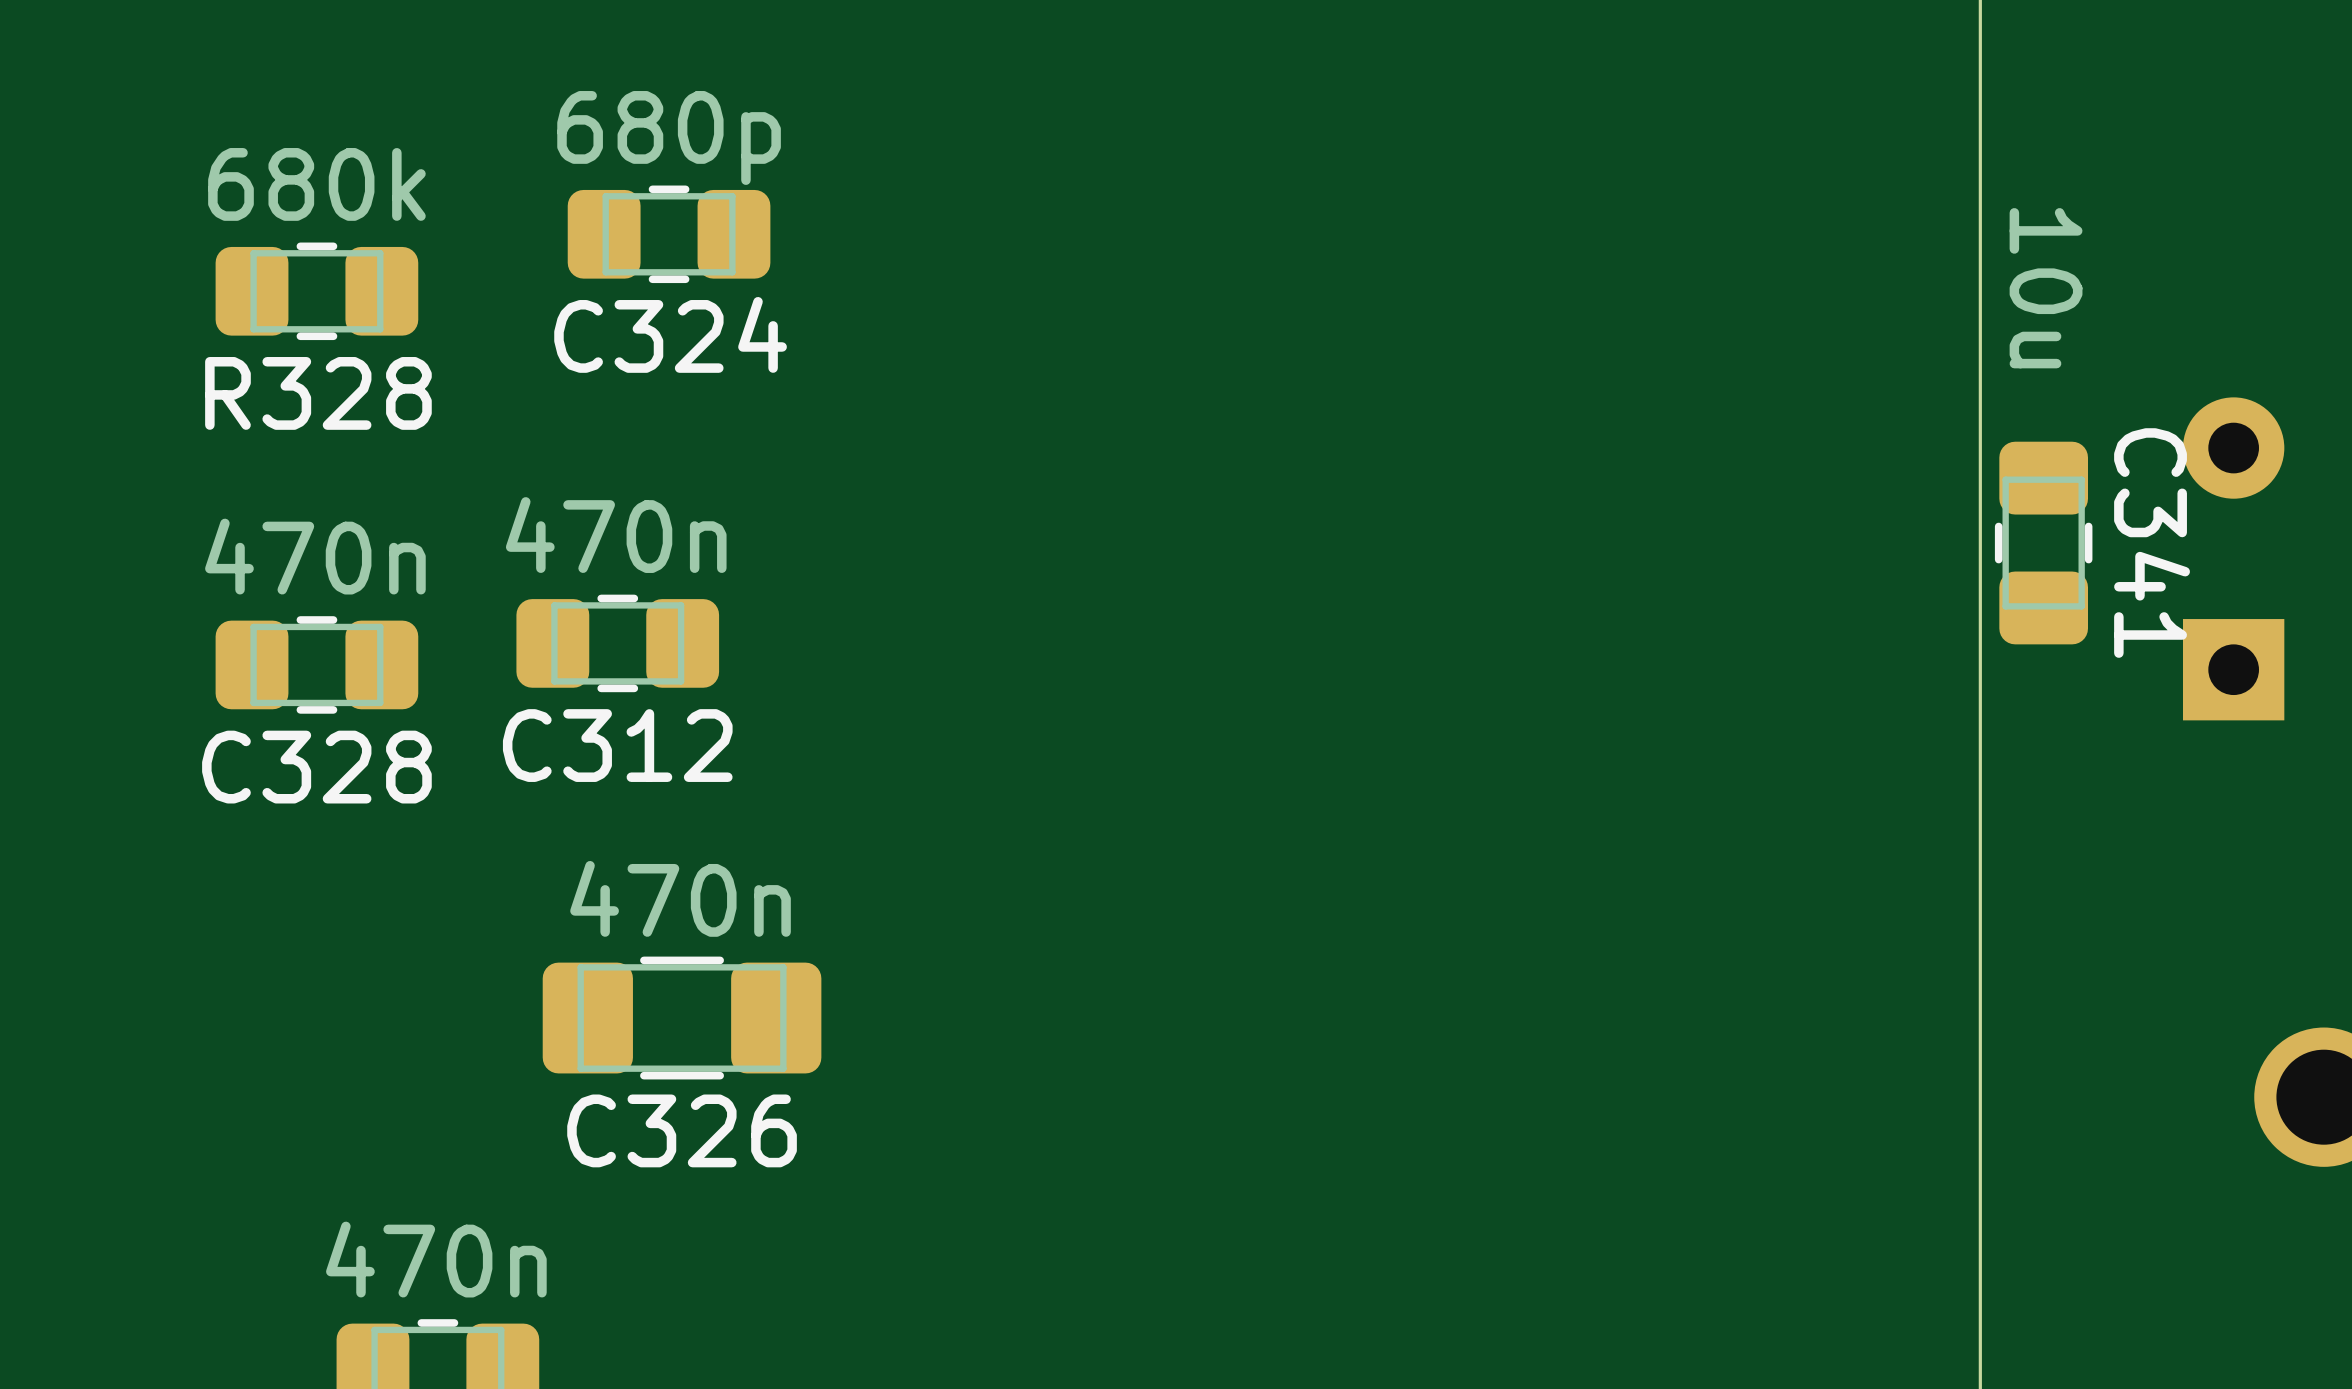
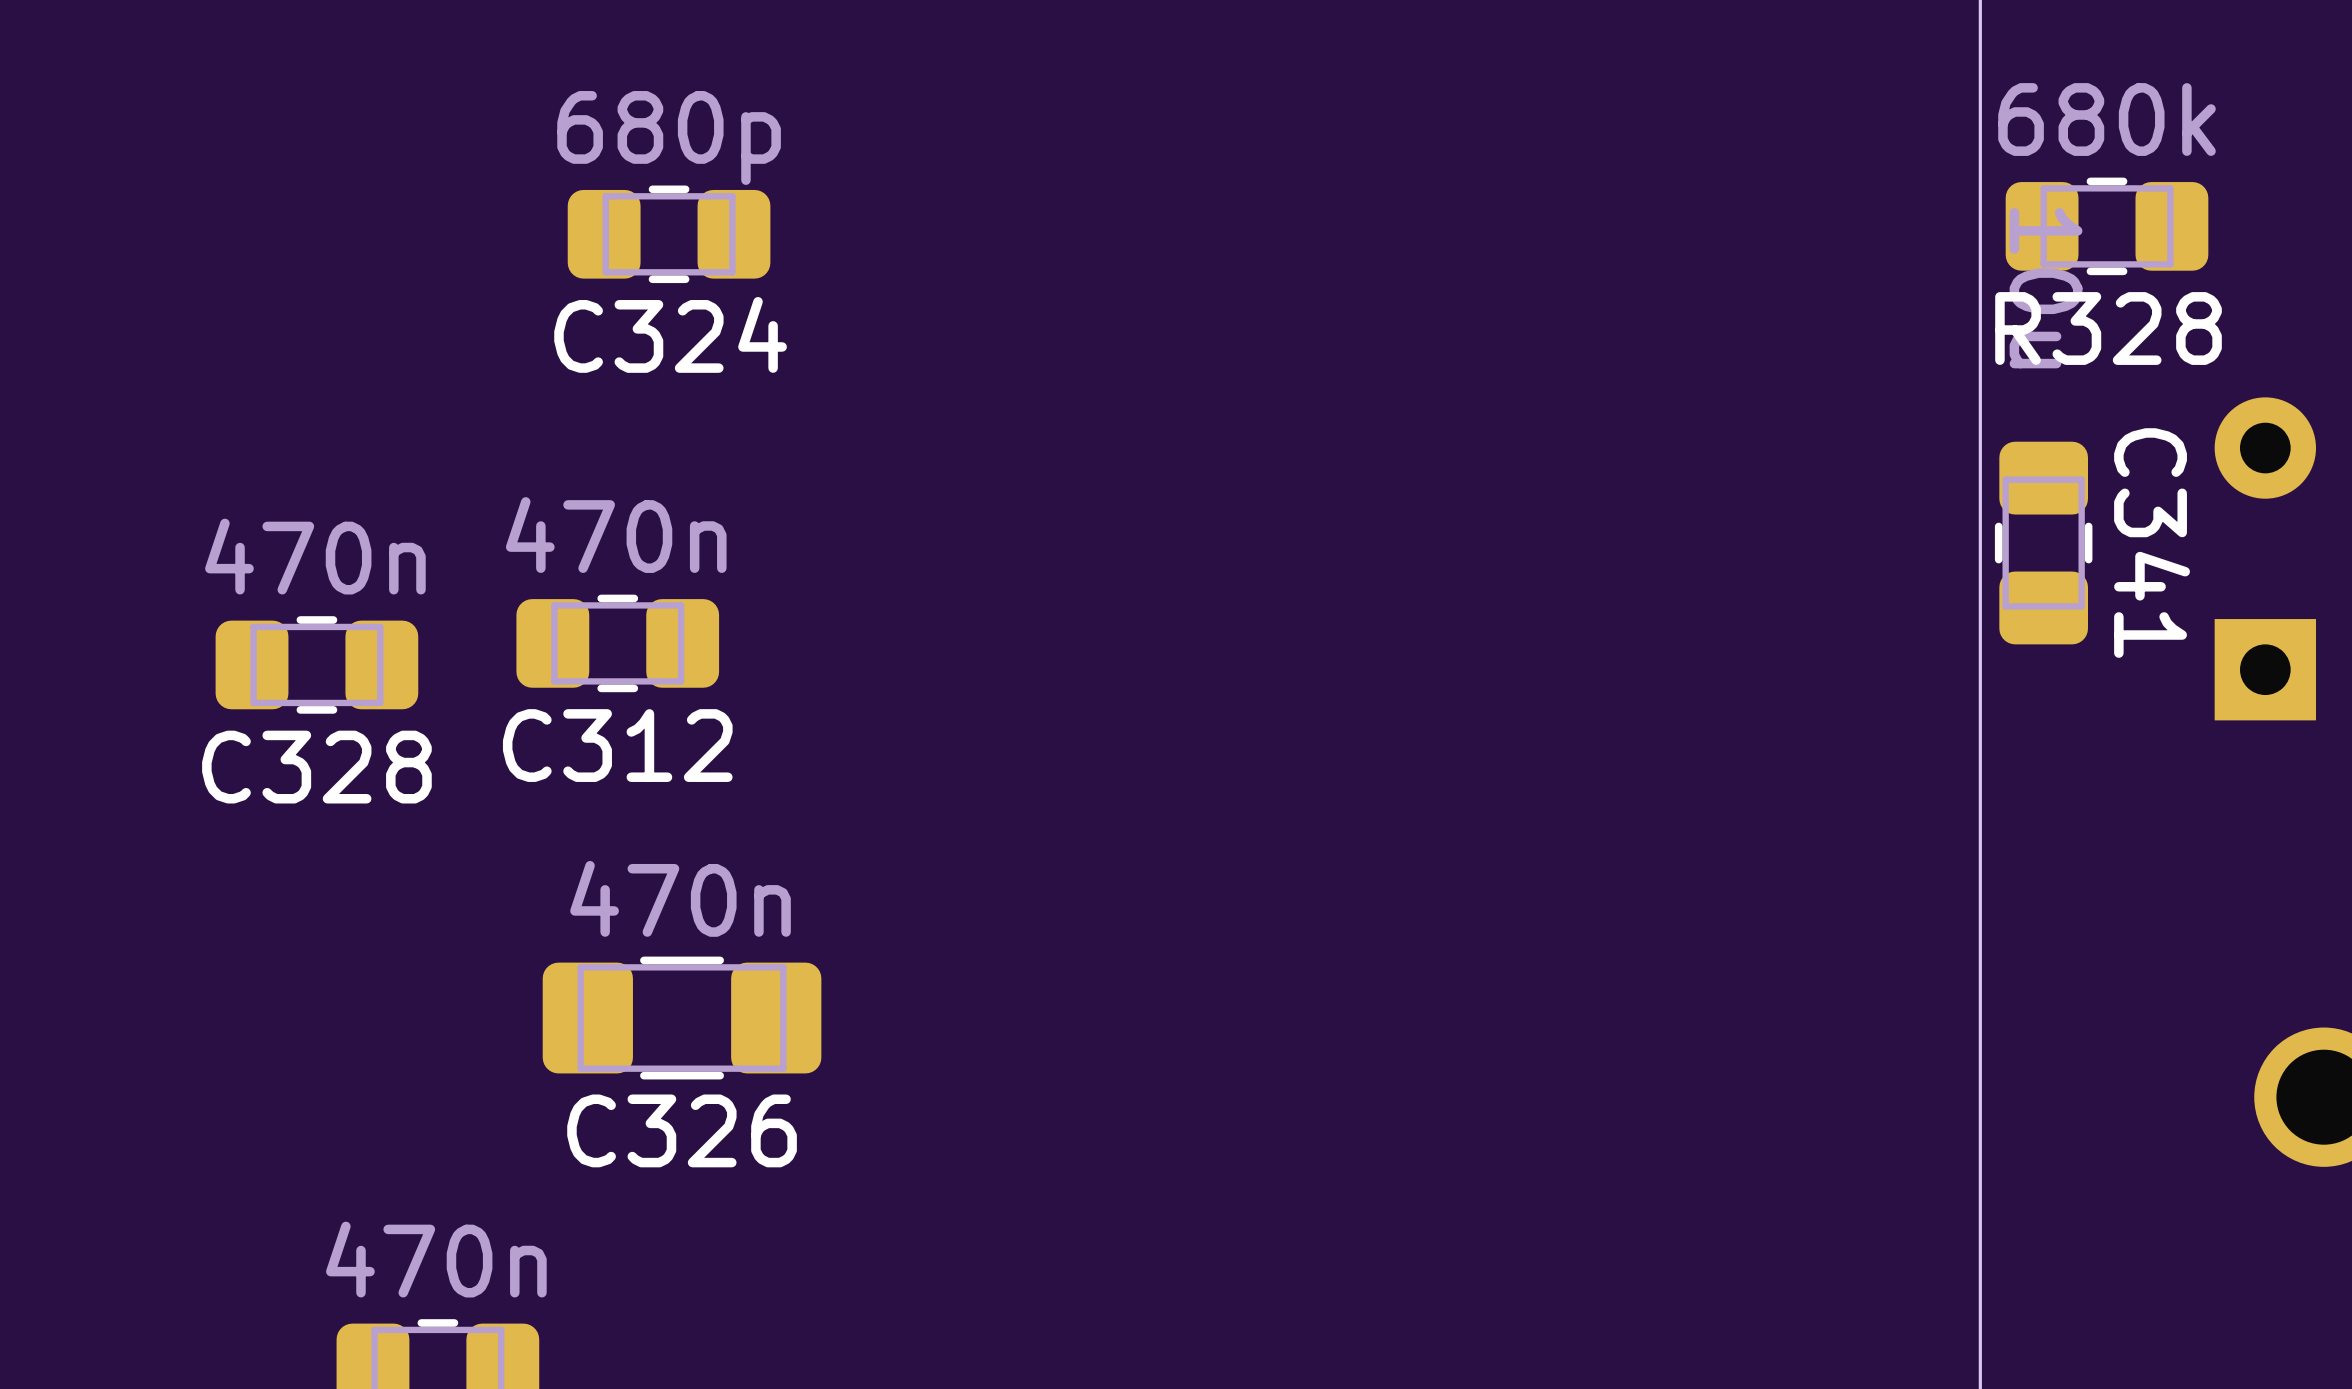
R328 position: (316, 291) -> (2107, 226)
part position: (2233, 558) -> (2265, 558)

